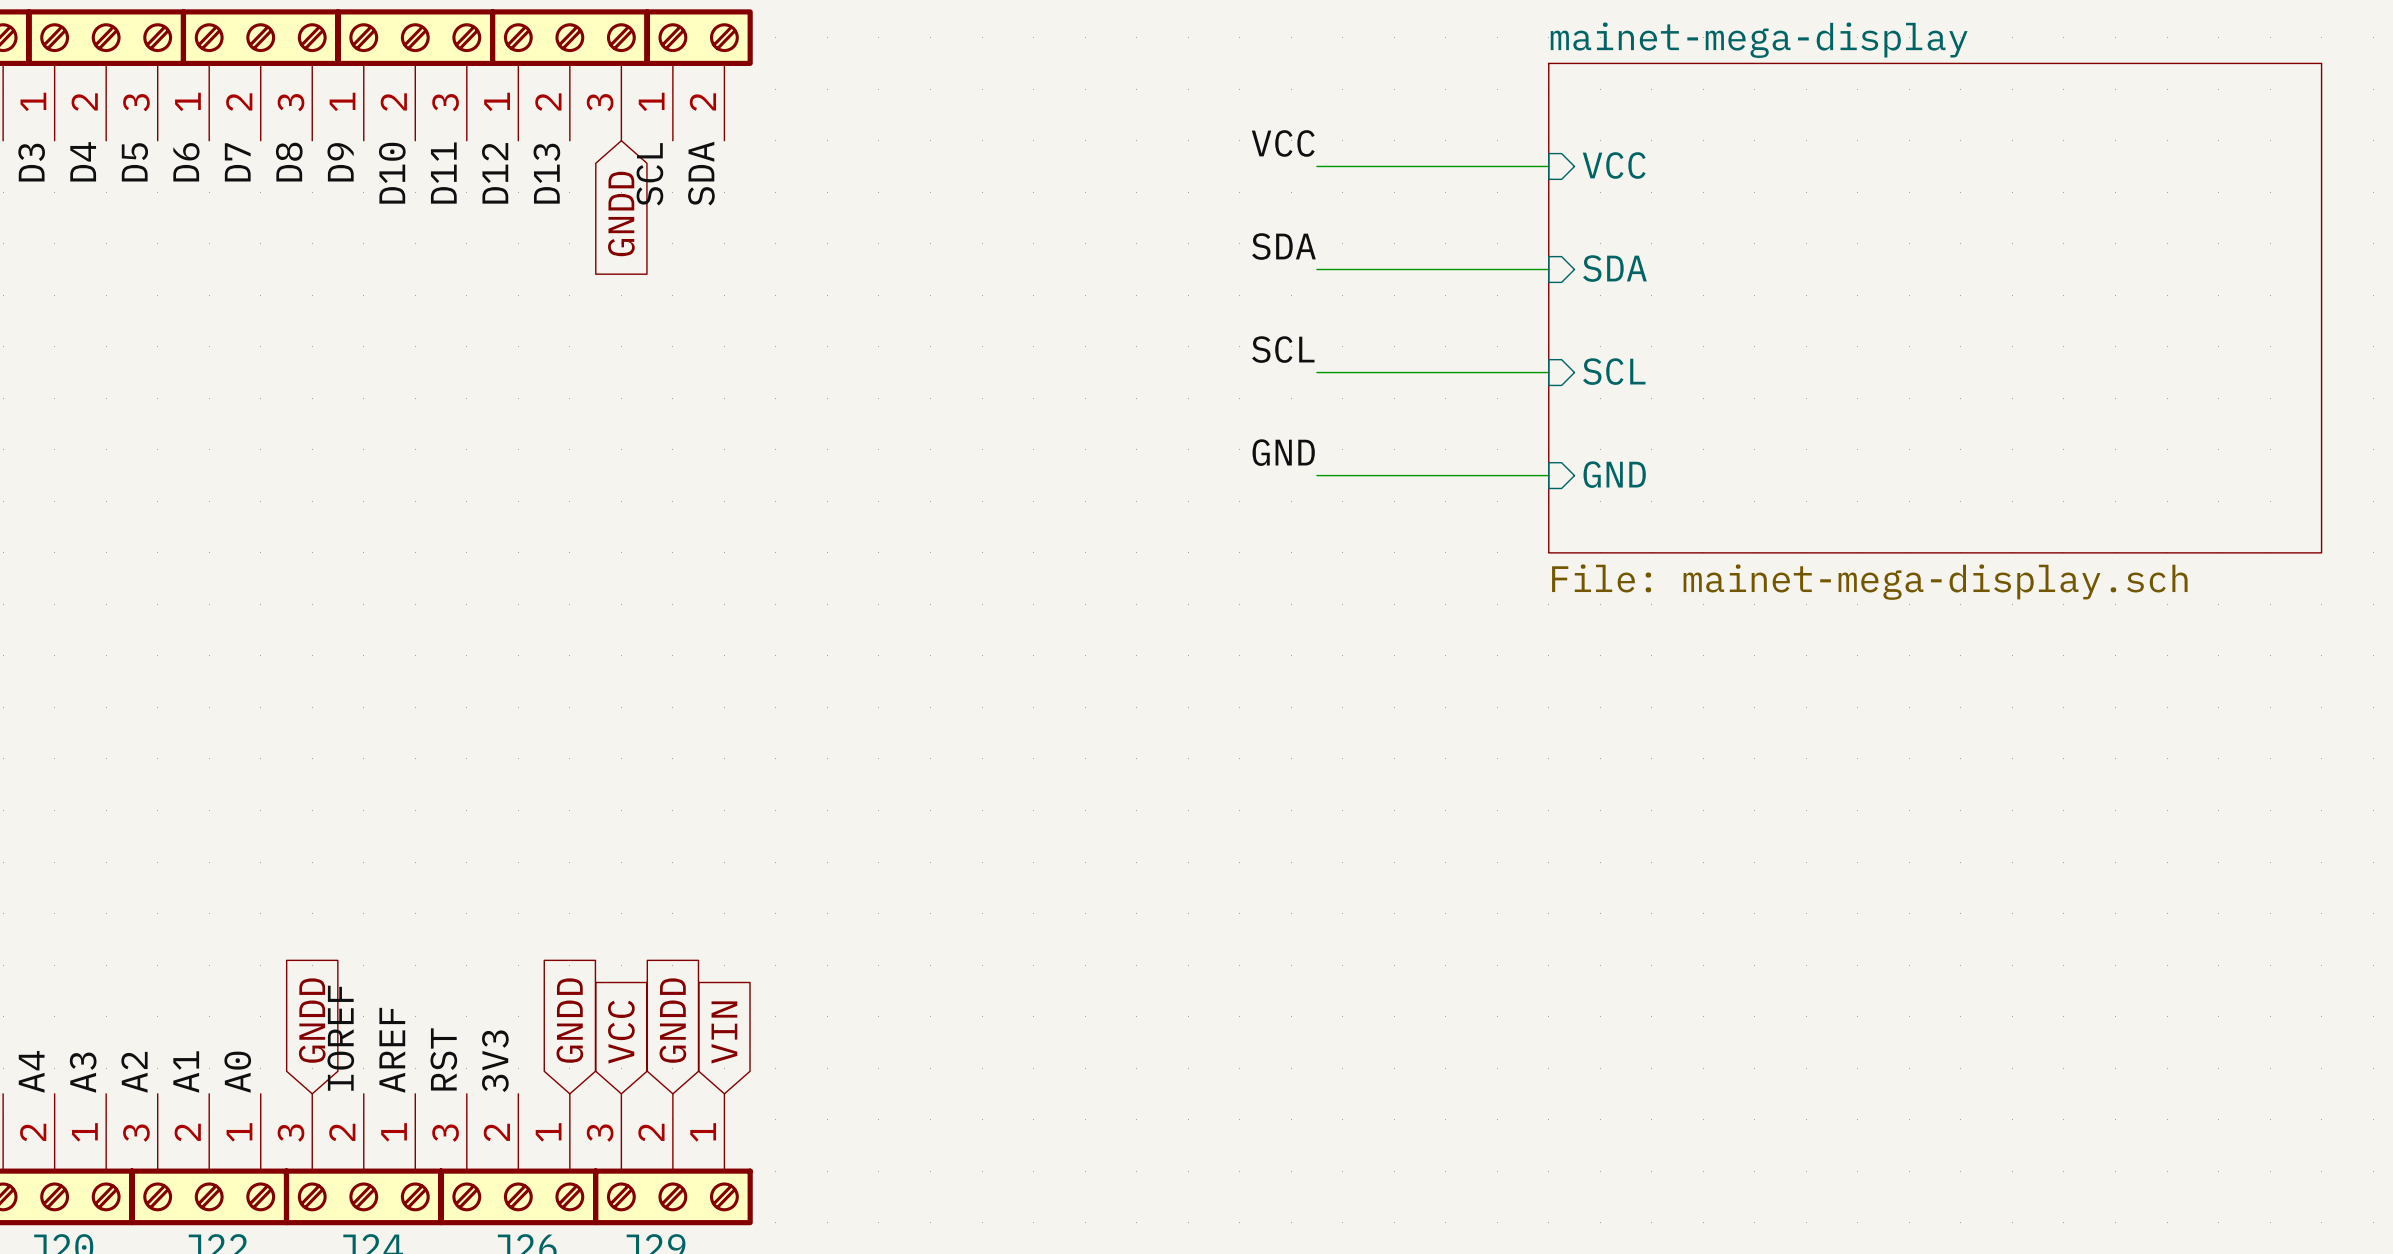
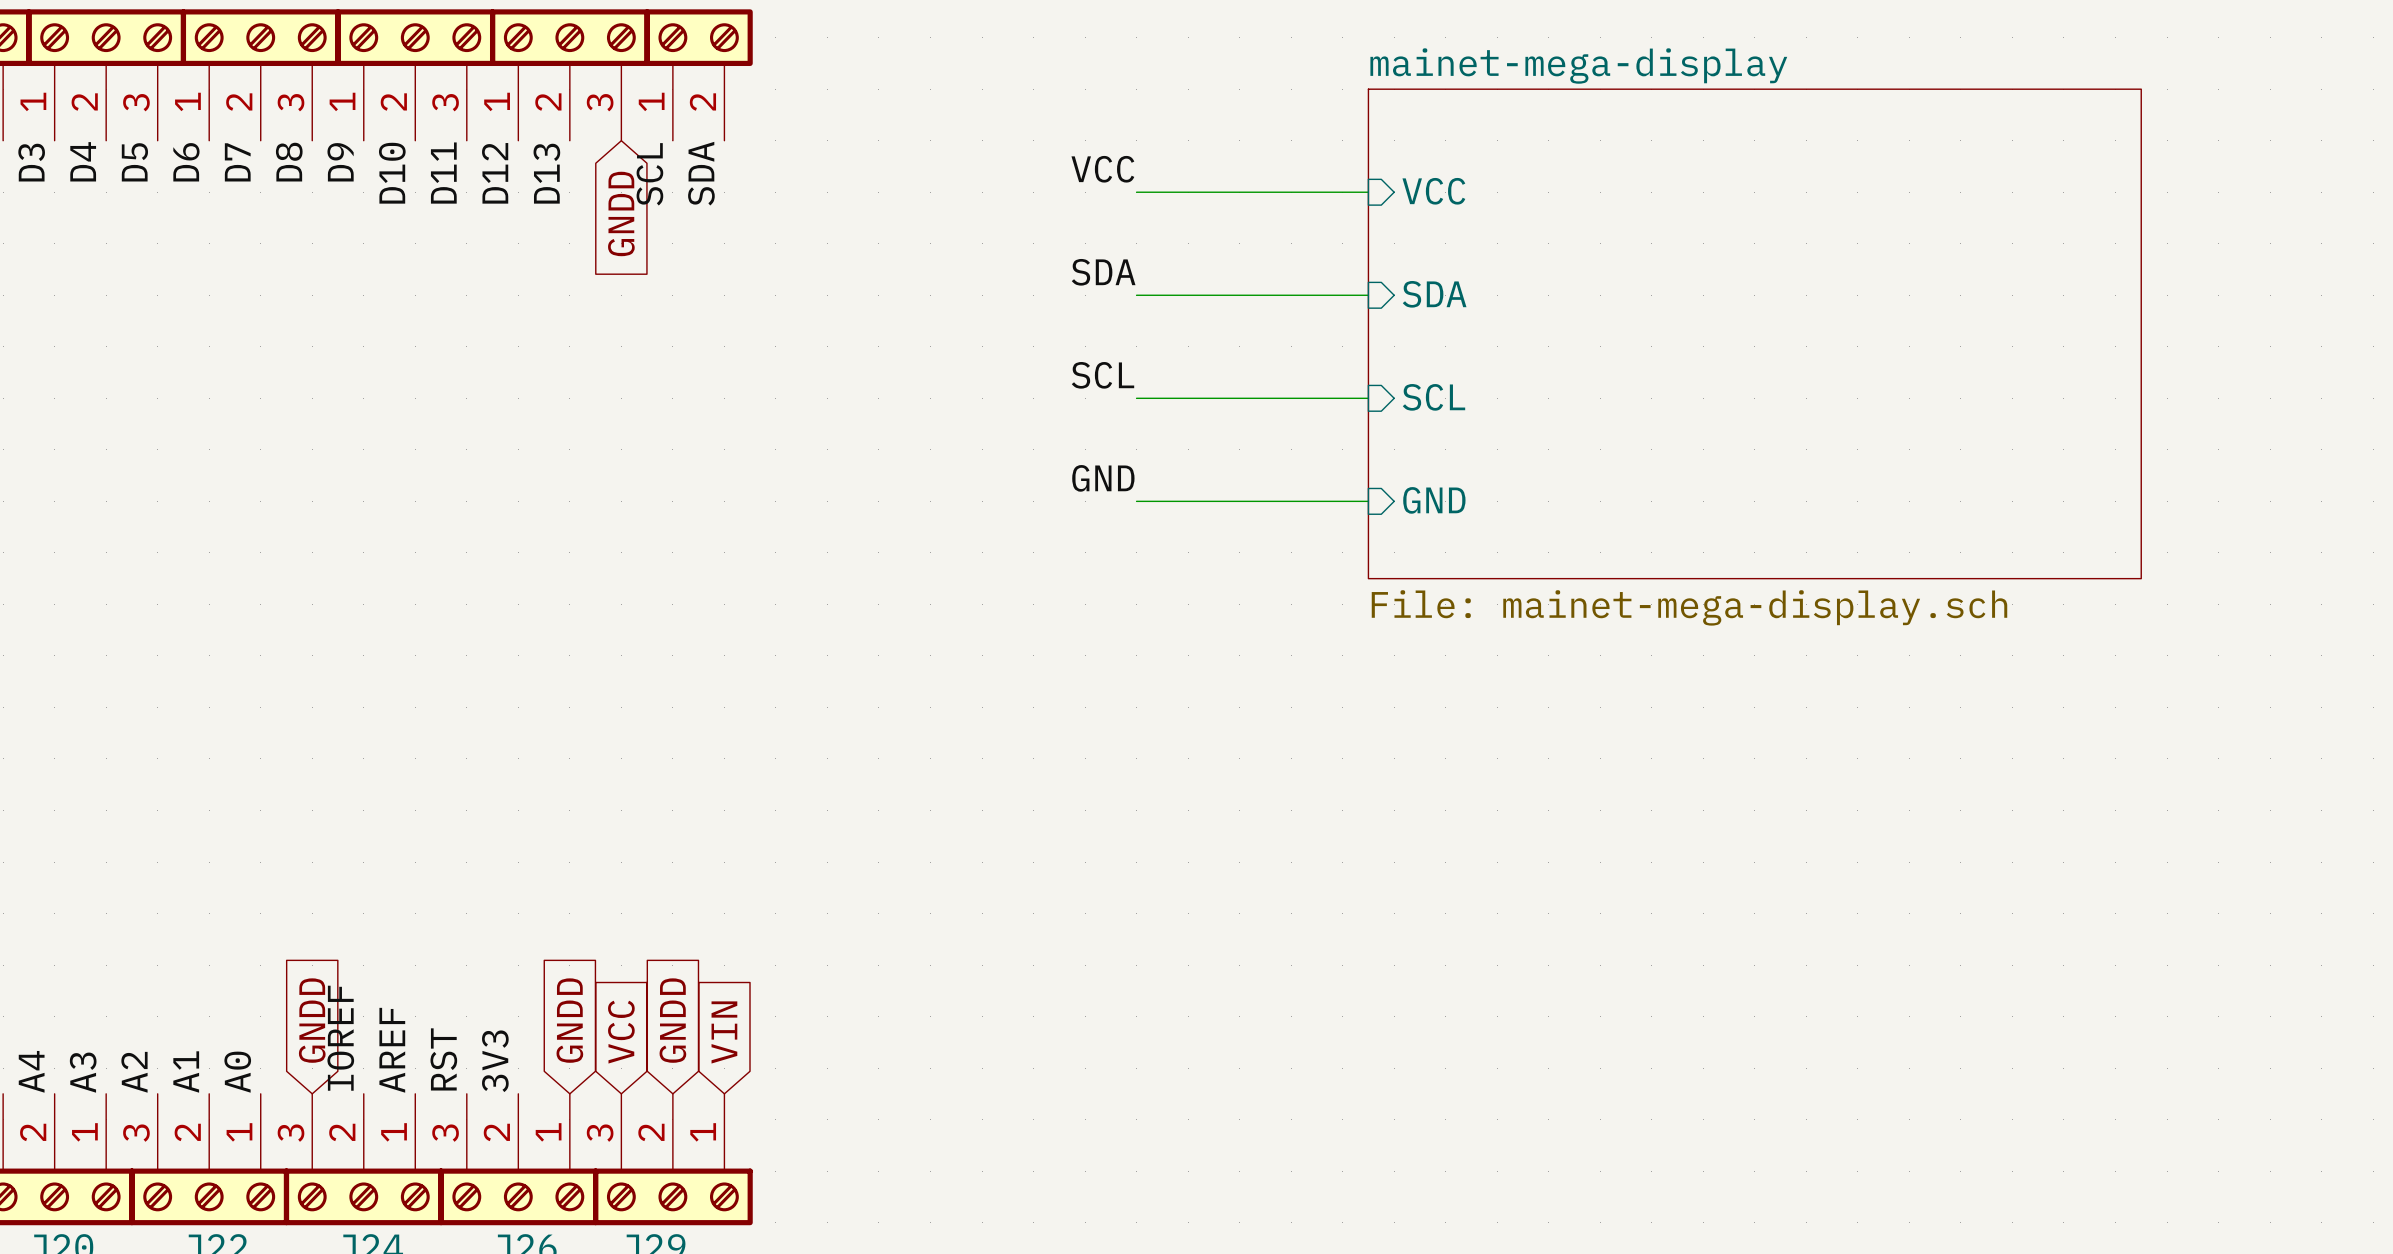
label position: VCC (1283, 143) -> VCC (1102, 169)
sheet pin position: VCC (1614, 165) -> VCC (1433, 191)
wire: (1316, 166) (1548, 166) -> (1136, 192) (1368, 192)
label position: SDA (1283, 246) -> SDA (1103, 272)
sheet pin position: SDA (1614, 268) -> SDA (1434, 294)
wire: (1316, 269) (1548, 269) -> (1136, 295) (1368, 295)
sheet mainet-mega-display position: (1935, 308) -> (1754, 333)
label position: SCL (1283, 349) -> SCL (1102, 375)
sheet pin position: SCL (1614, 371) -> SCL (1433, 397)
wire: (1316, 372) (1548, 372) -> (1136, 398) (1368, 398)
label position: GND (1283, 452) -> GND (1103, 478)
sheet pin position: GND (1614, 474) -> GND (1434, 500)
wire: (1316, 475) (1548, 475) -> (1136, 501) (1368, 501)

